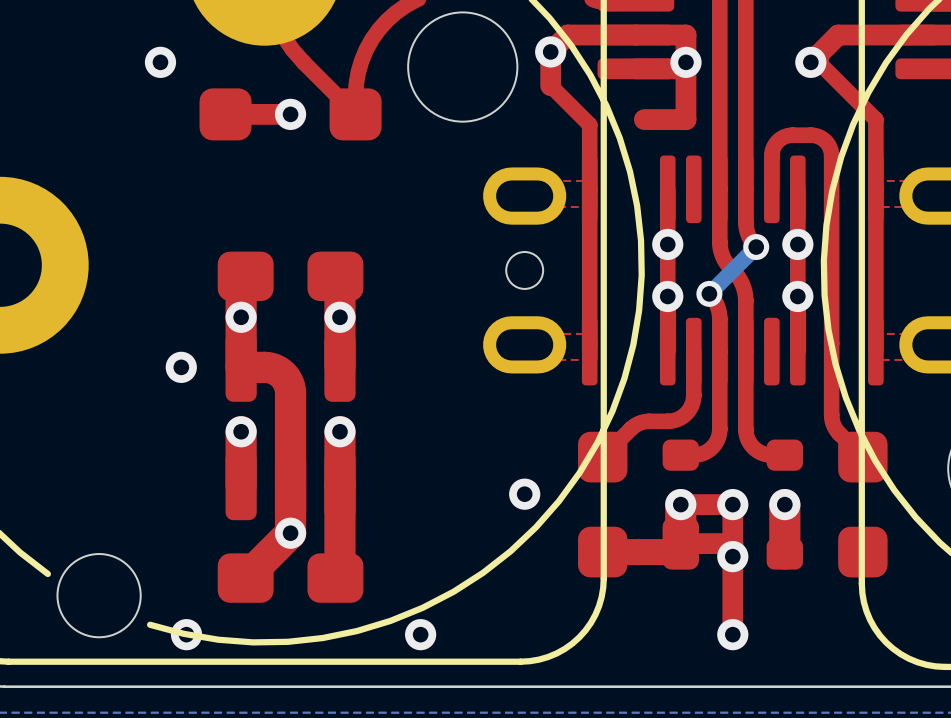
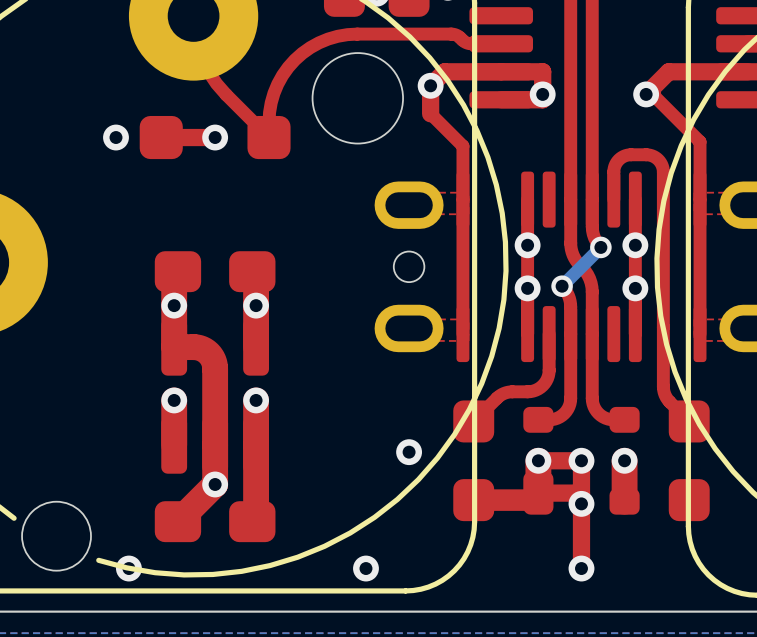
via position: (160, 62) -> (116, 137)
top track: (685, 68) (685, 119) (644, 119) -> none
via: (181, 367) -> none
via position: (420, 634) -> (365, 568)

